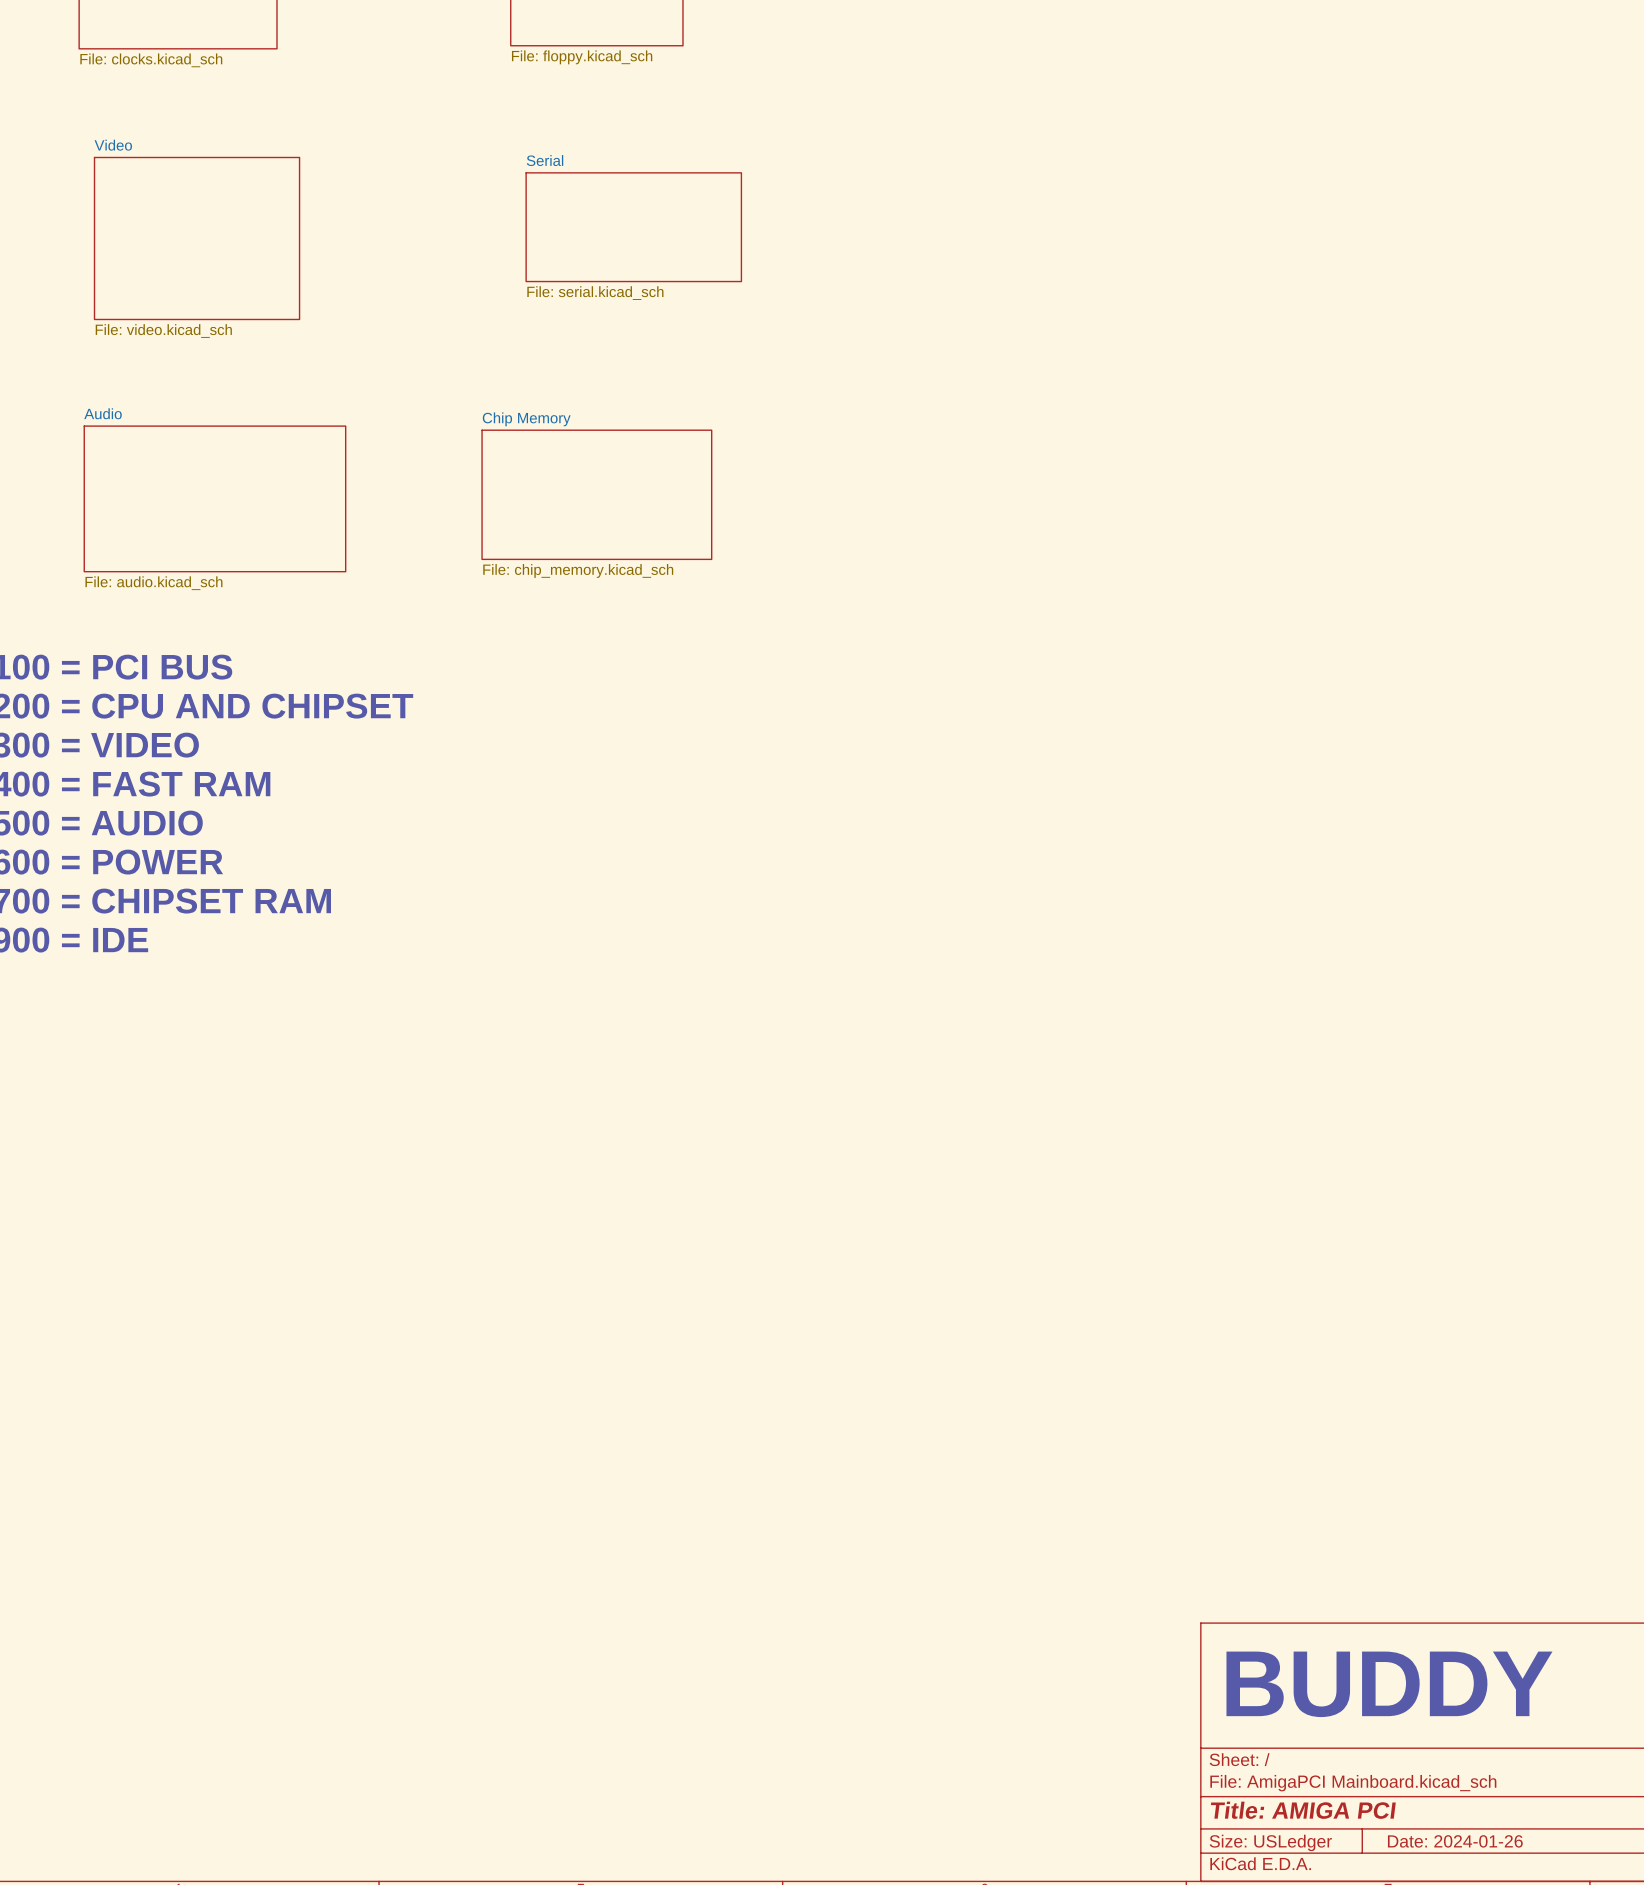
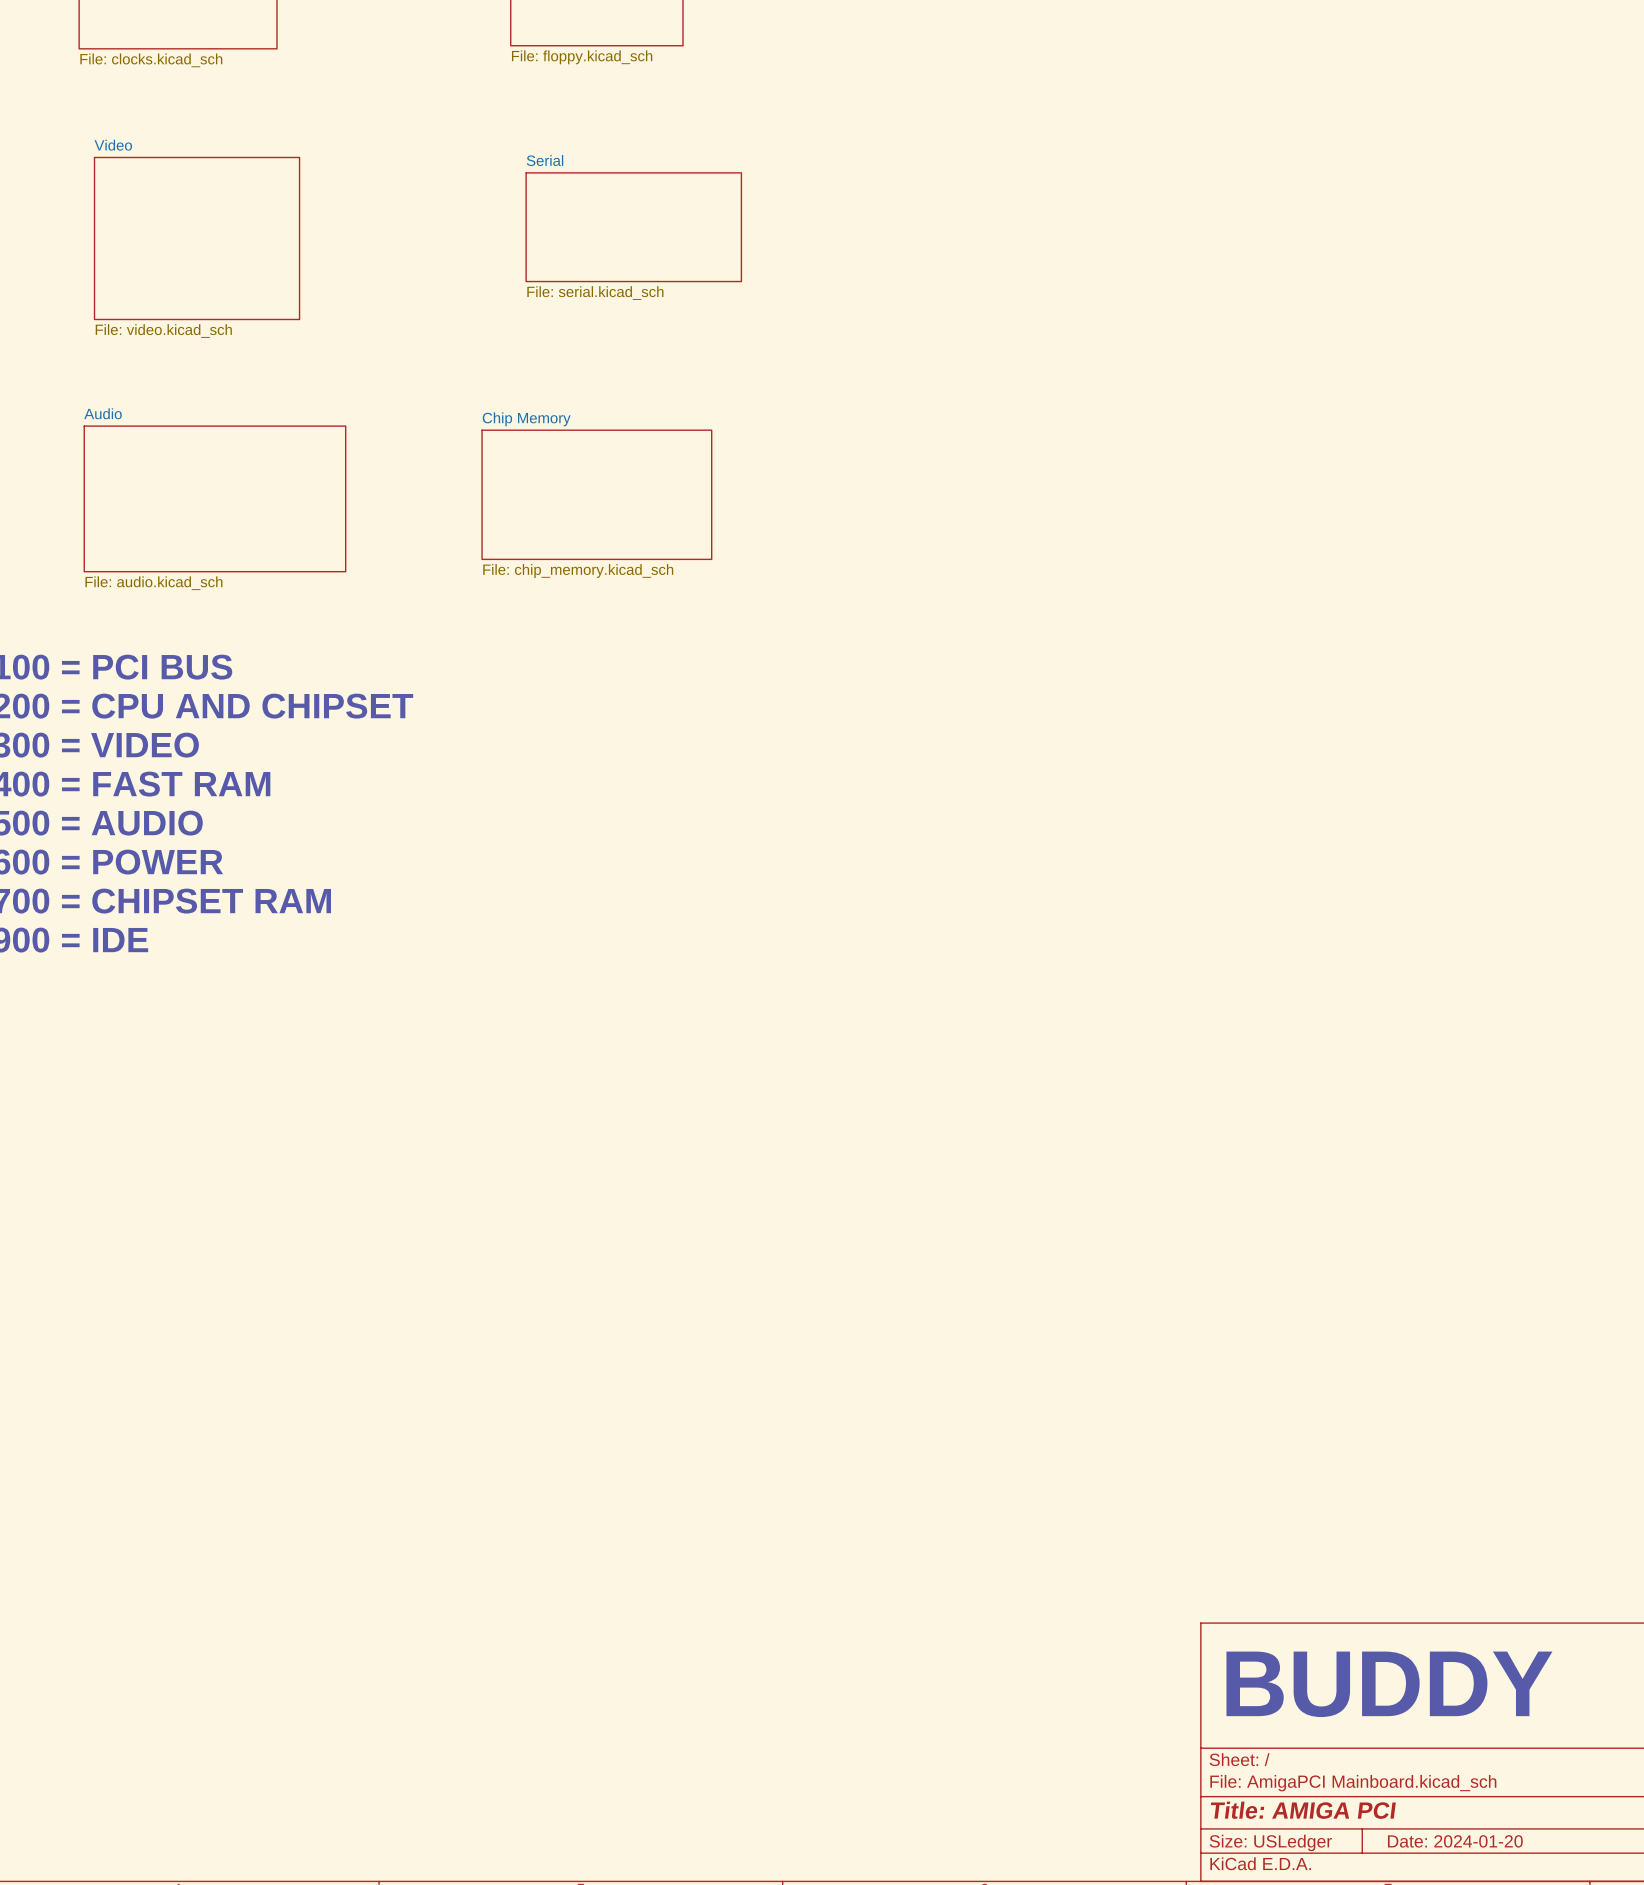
title block: Date: 2024-01-26 (1455, 1841) -> Date: 2024-01-20 (1455, 1841)

